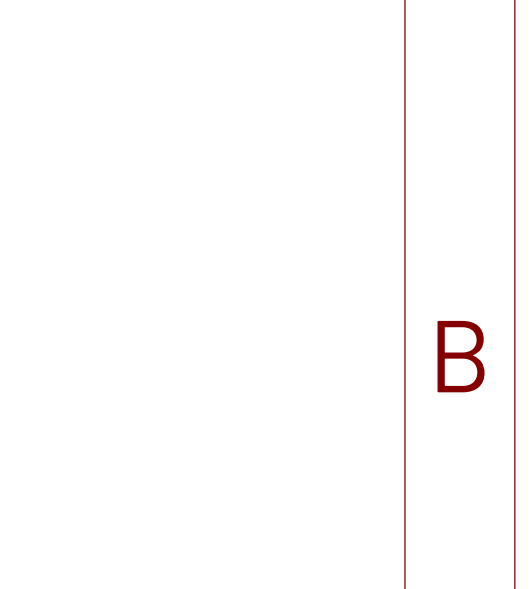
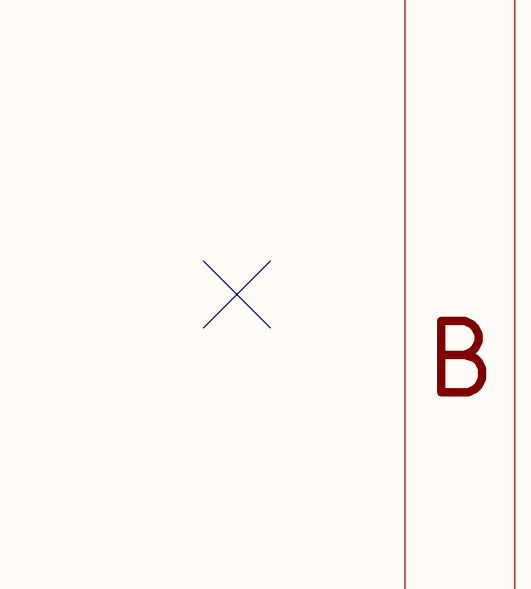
no-connect mark: none -> (236, 294)

